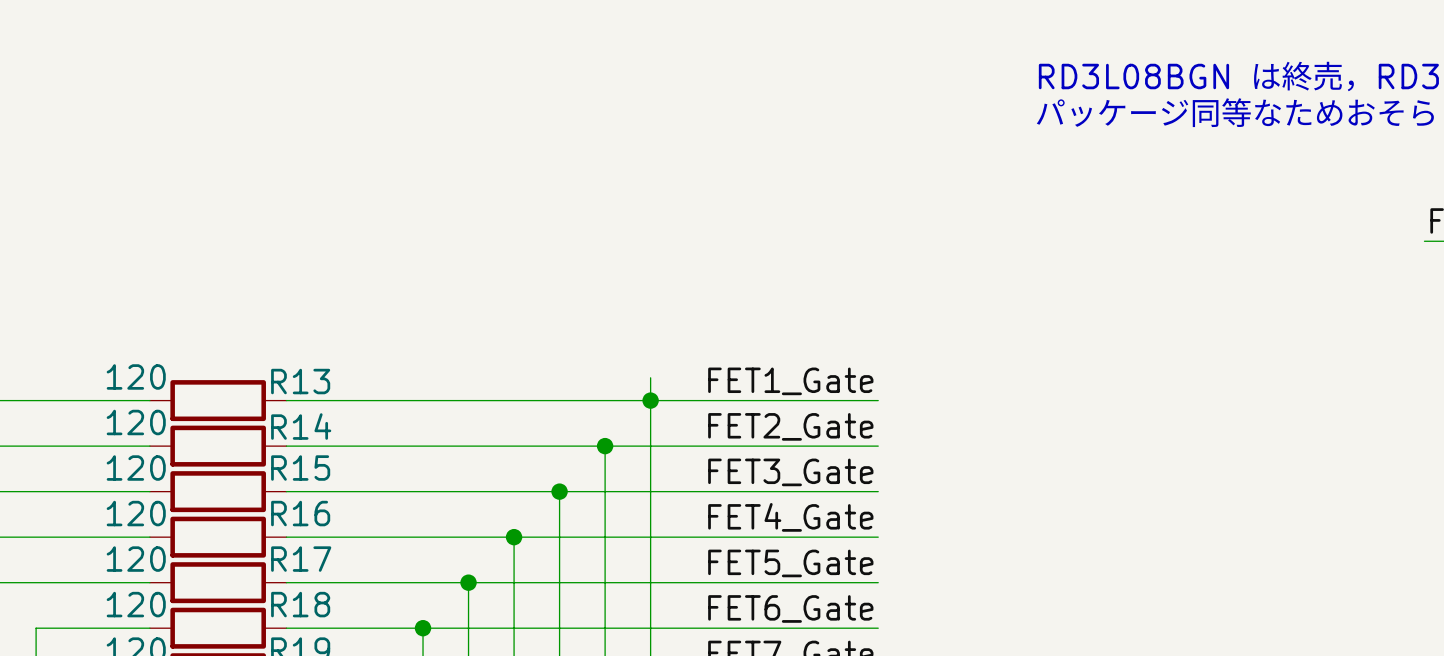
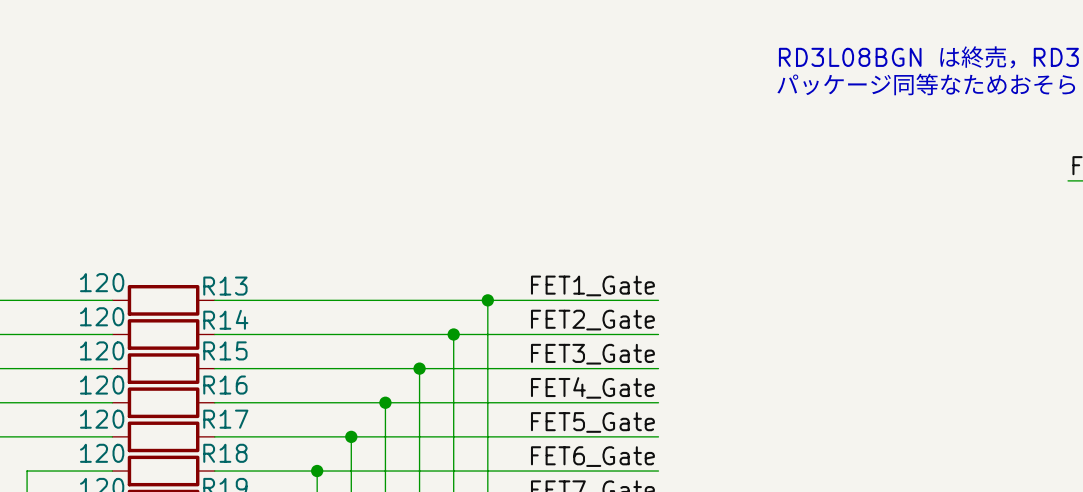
wire: (650, 377) (650, 400) -> none

